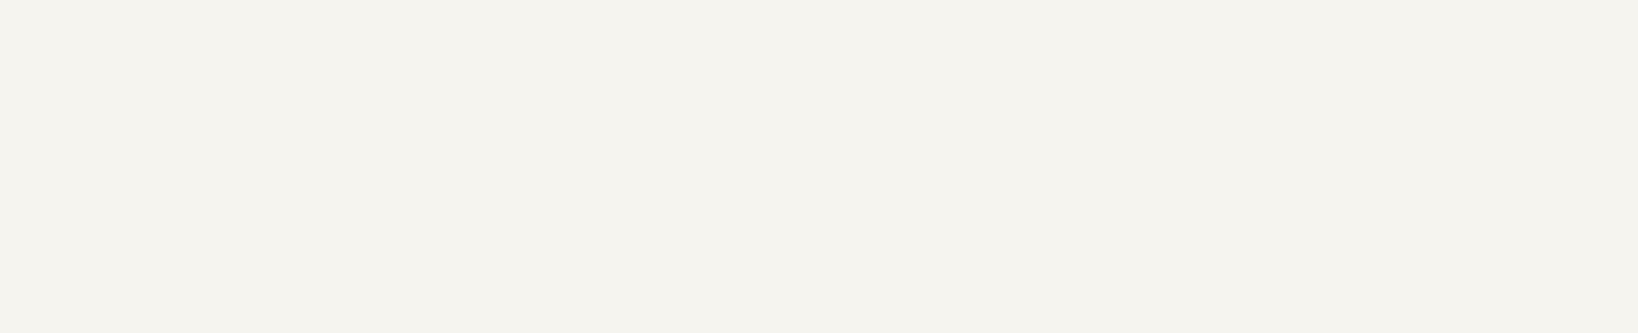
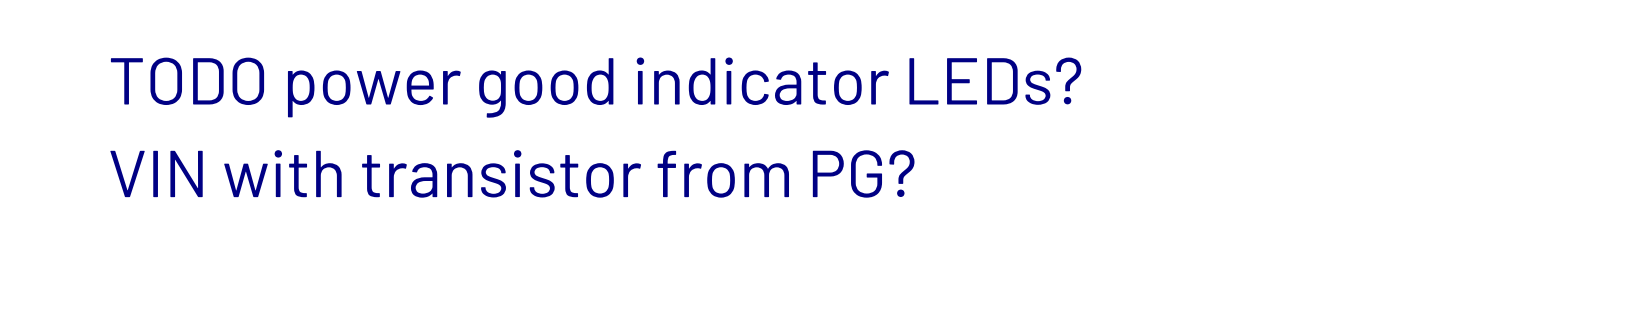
text: none -> TODO power good indicator LEDs? (596, 87)
text: none -> VIN with transistor from PG? (512, 173)

